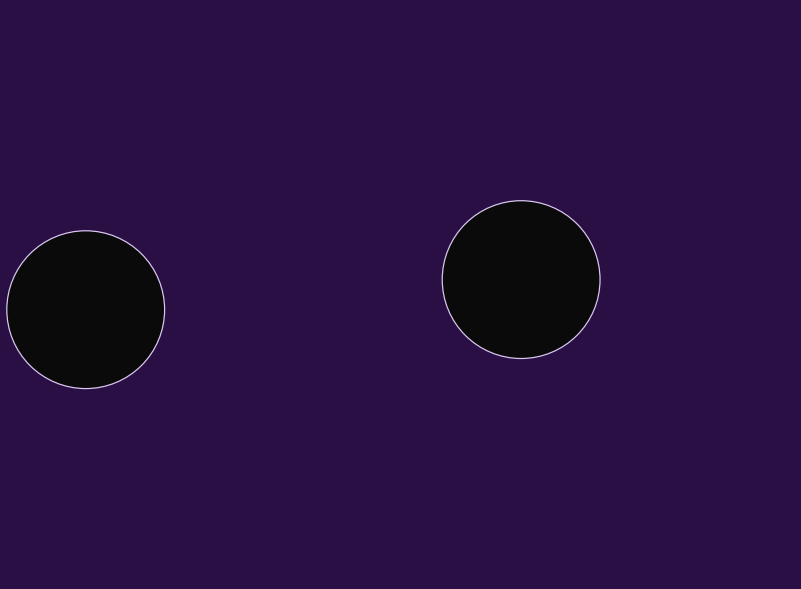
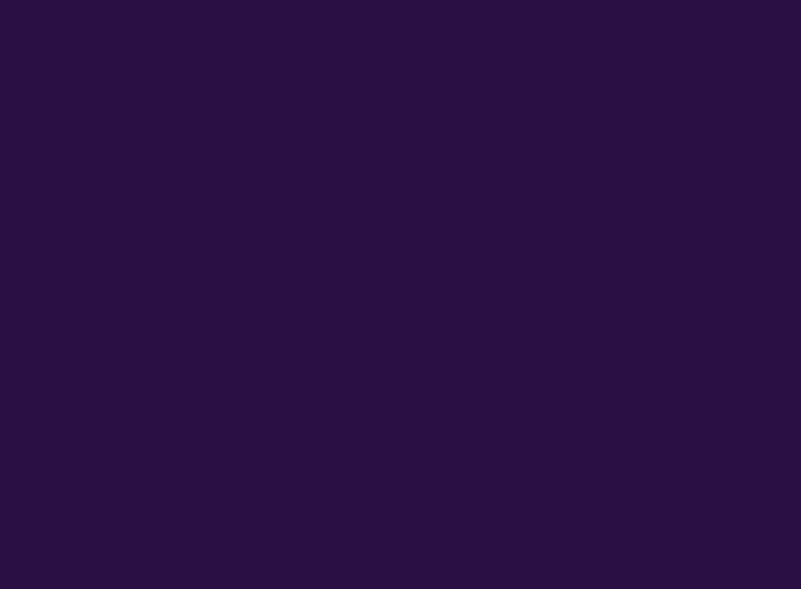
part: (521, 279) -> none
part: (85, 309) -> none

